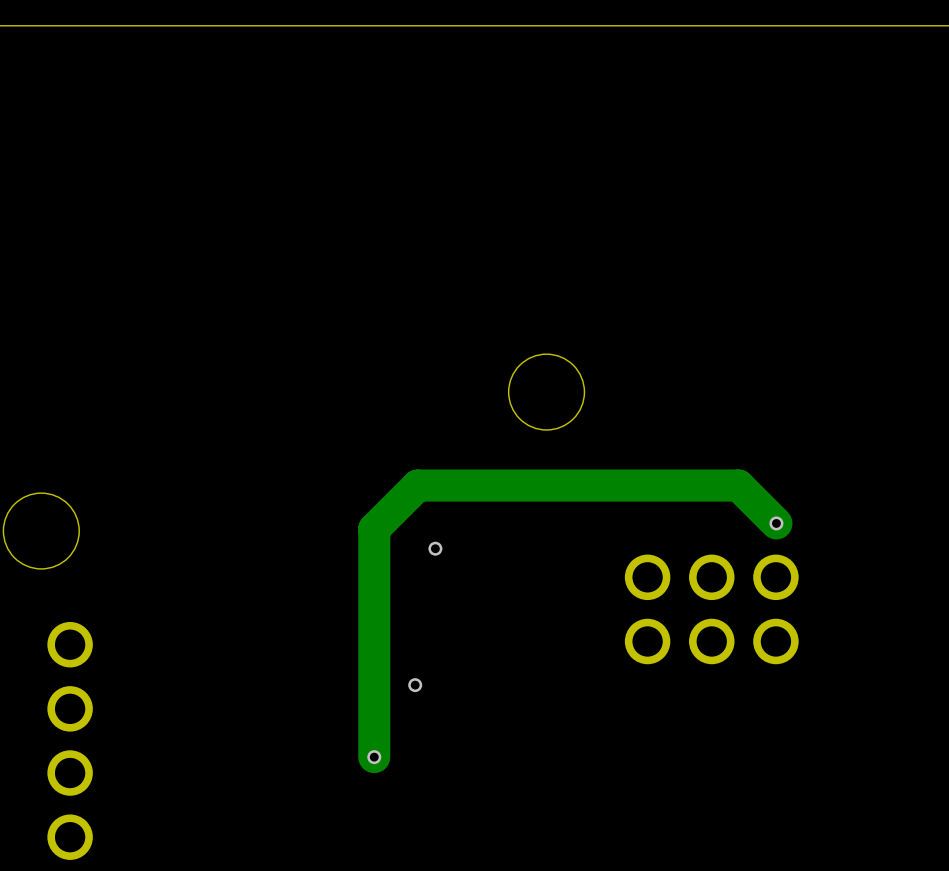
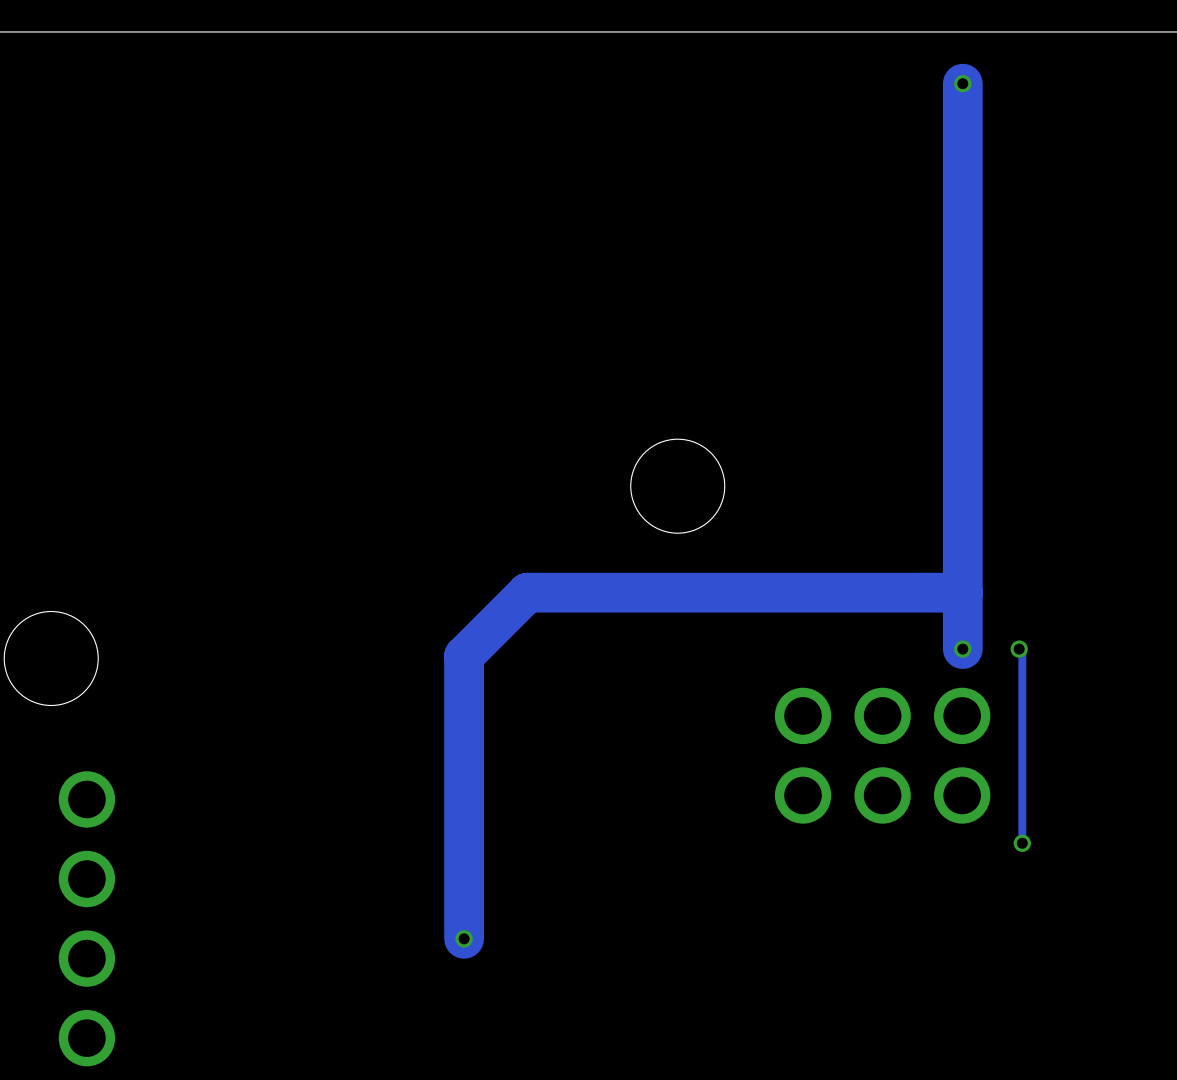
track: none -> (962, 83) (962, 649)
via: none -> (962, 83)
track: (417, 485) (738, 485) (776, 523) -> (517, 602) (527, 592) (962, 592)
track: none -> (1019, 649) (1022, 652) (1022, 843)
via: none -> (1019, 649)
via: (435, 548) -> none
via: none -> (1022, 843)
via: (415, 685) -> none

